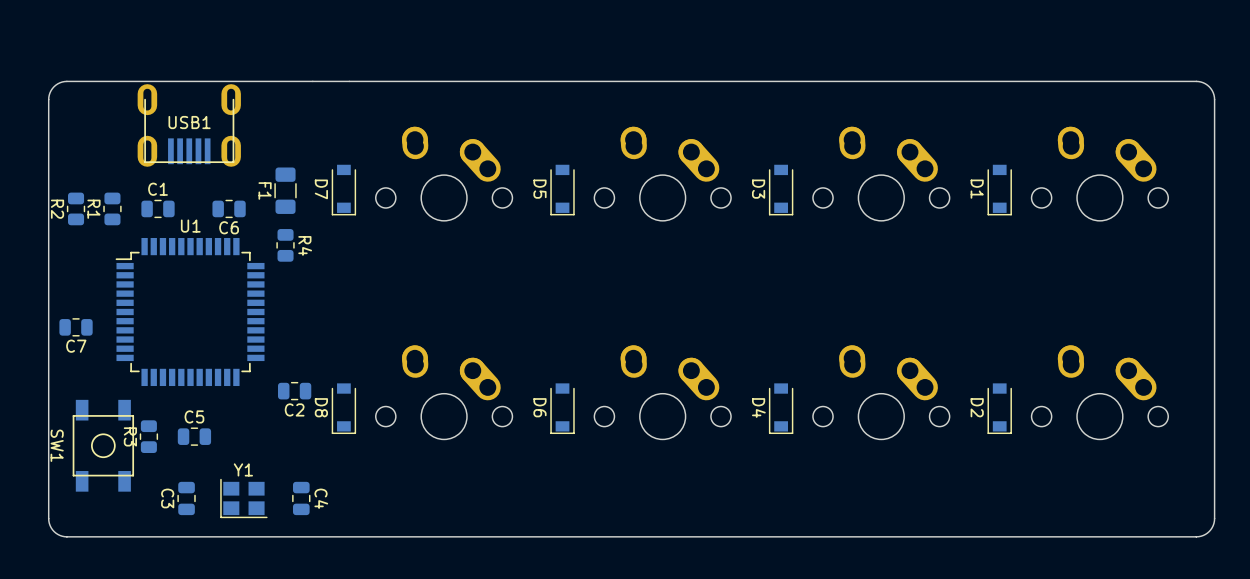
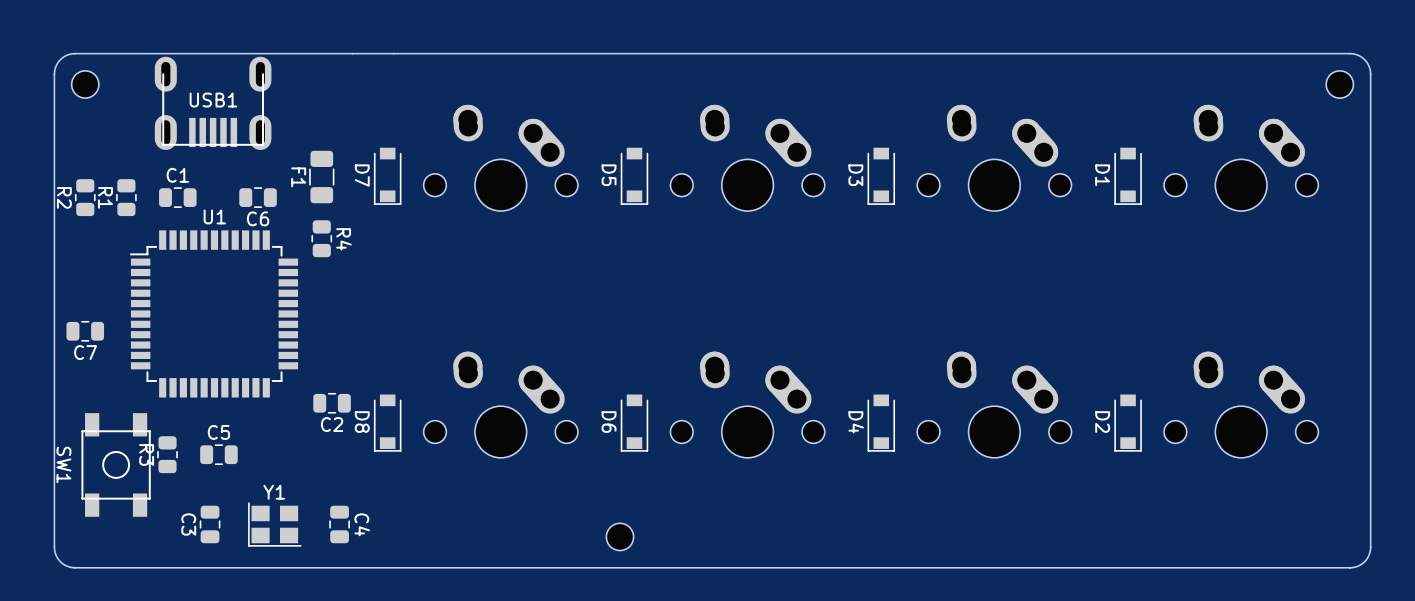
part: none -> (85, 84)
part: none -> (1339, 84)
part: none -> (619, 536)

